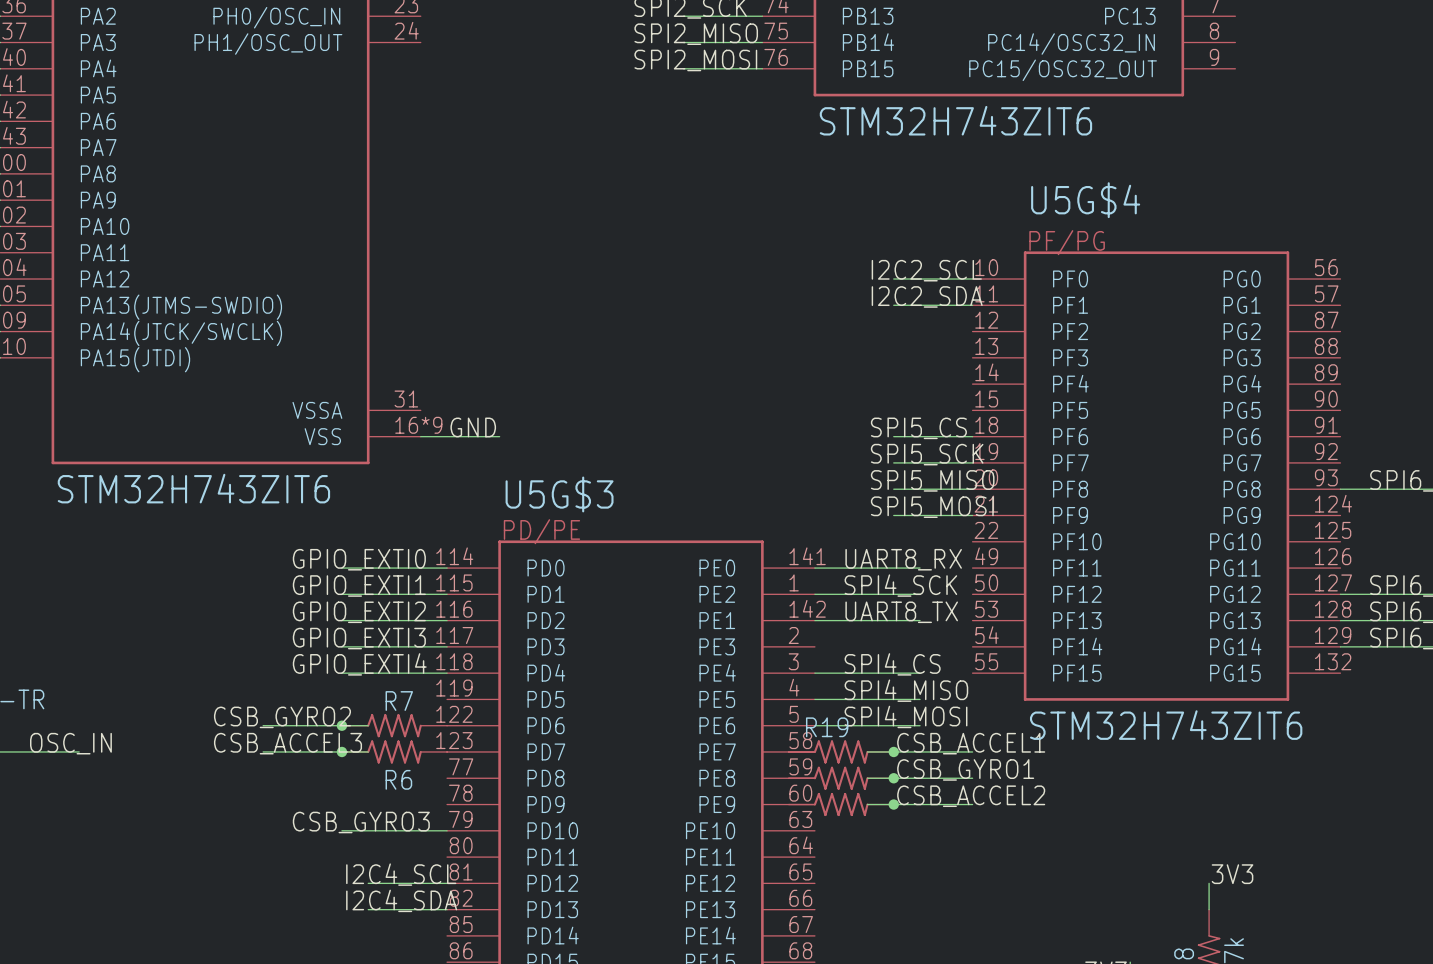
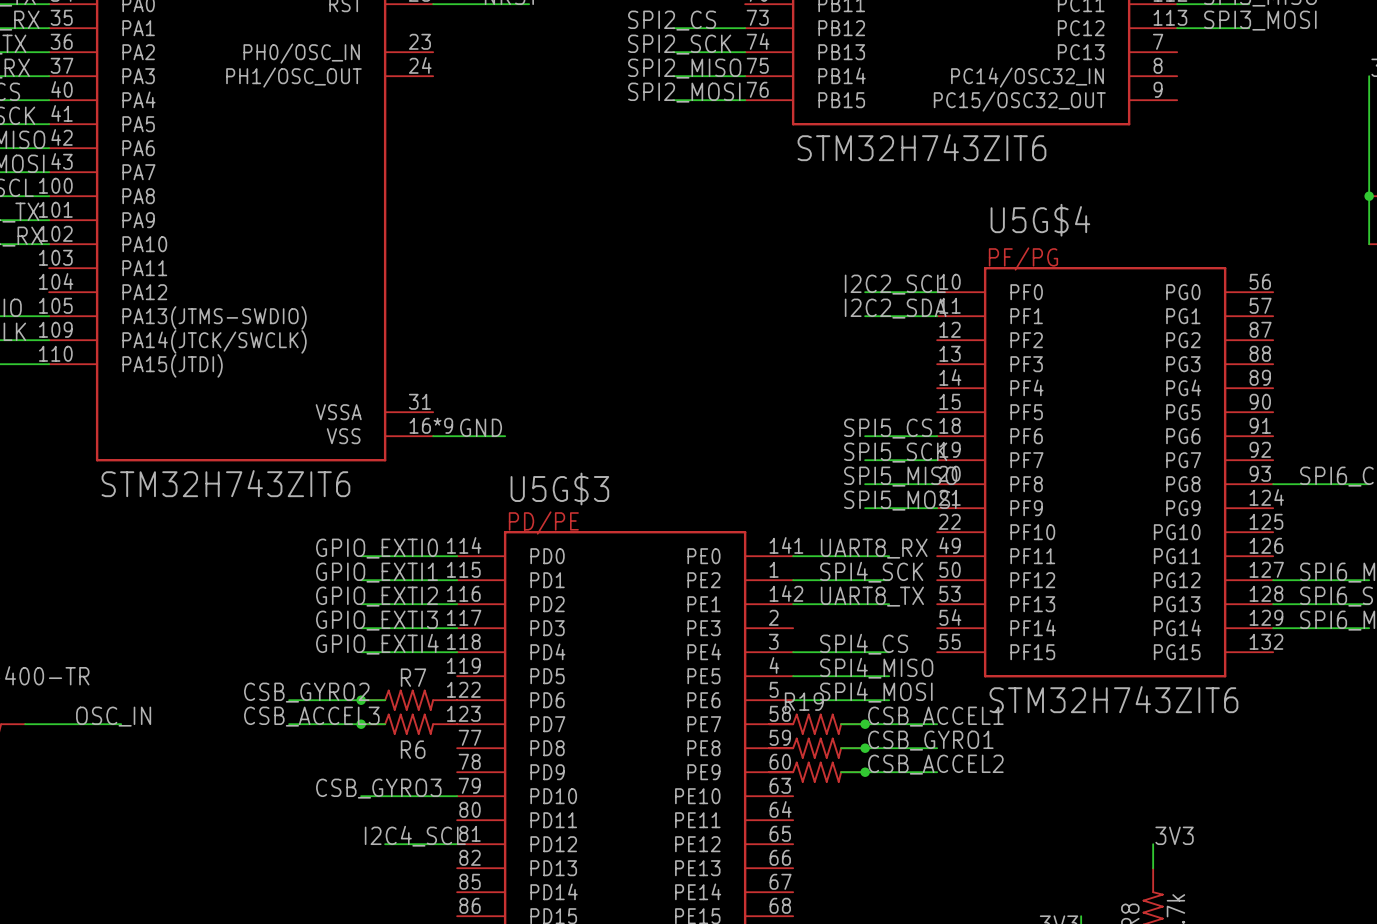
label: I2C4_SDA (401, 900) -> none
wire: (368, 909) (447, 909) -> none

